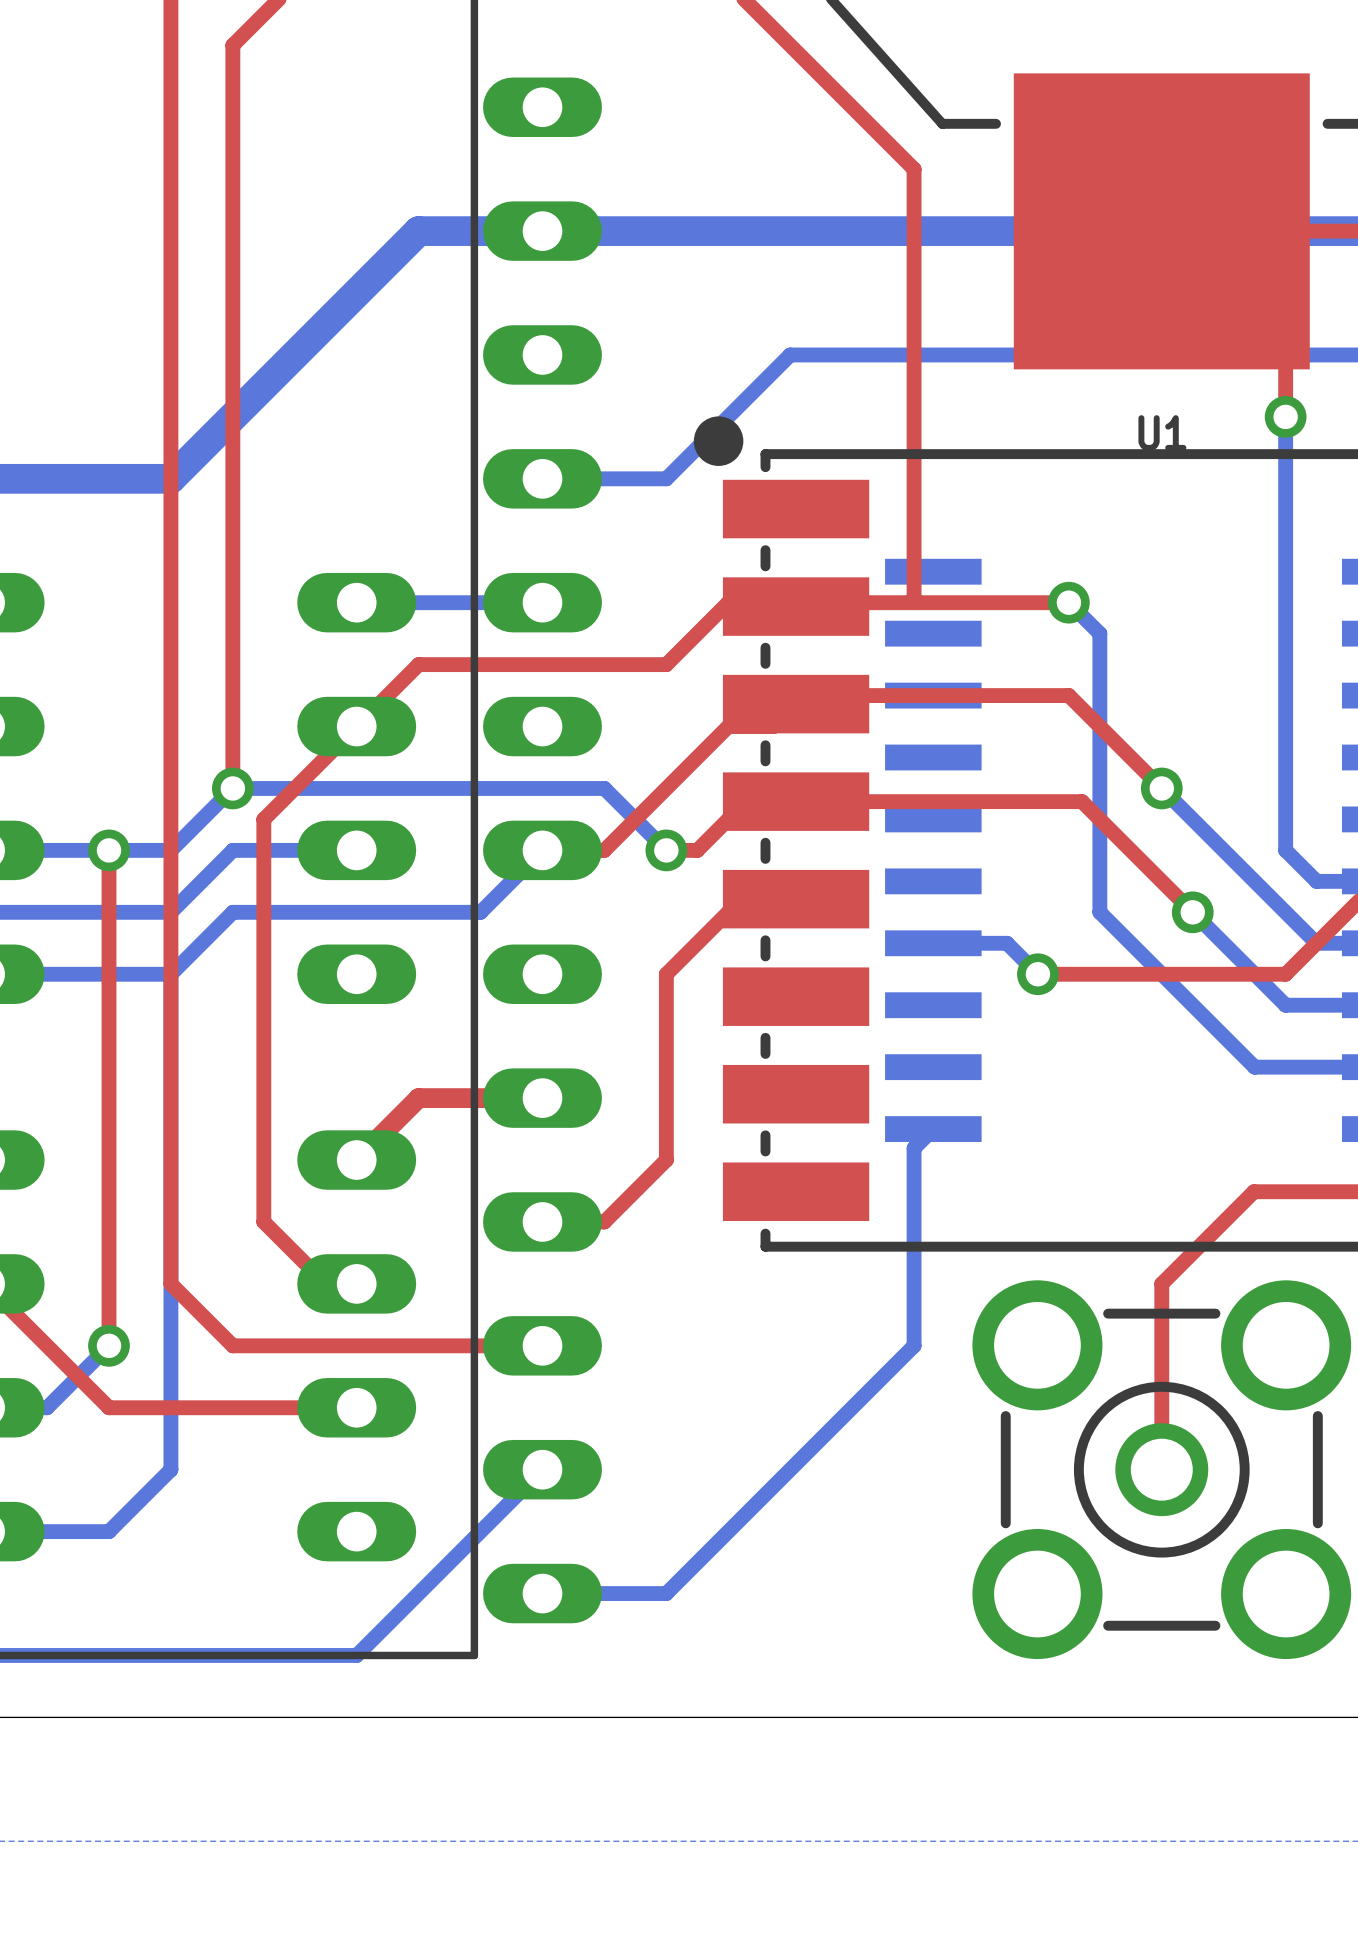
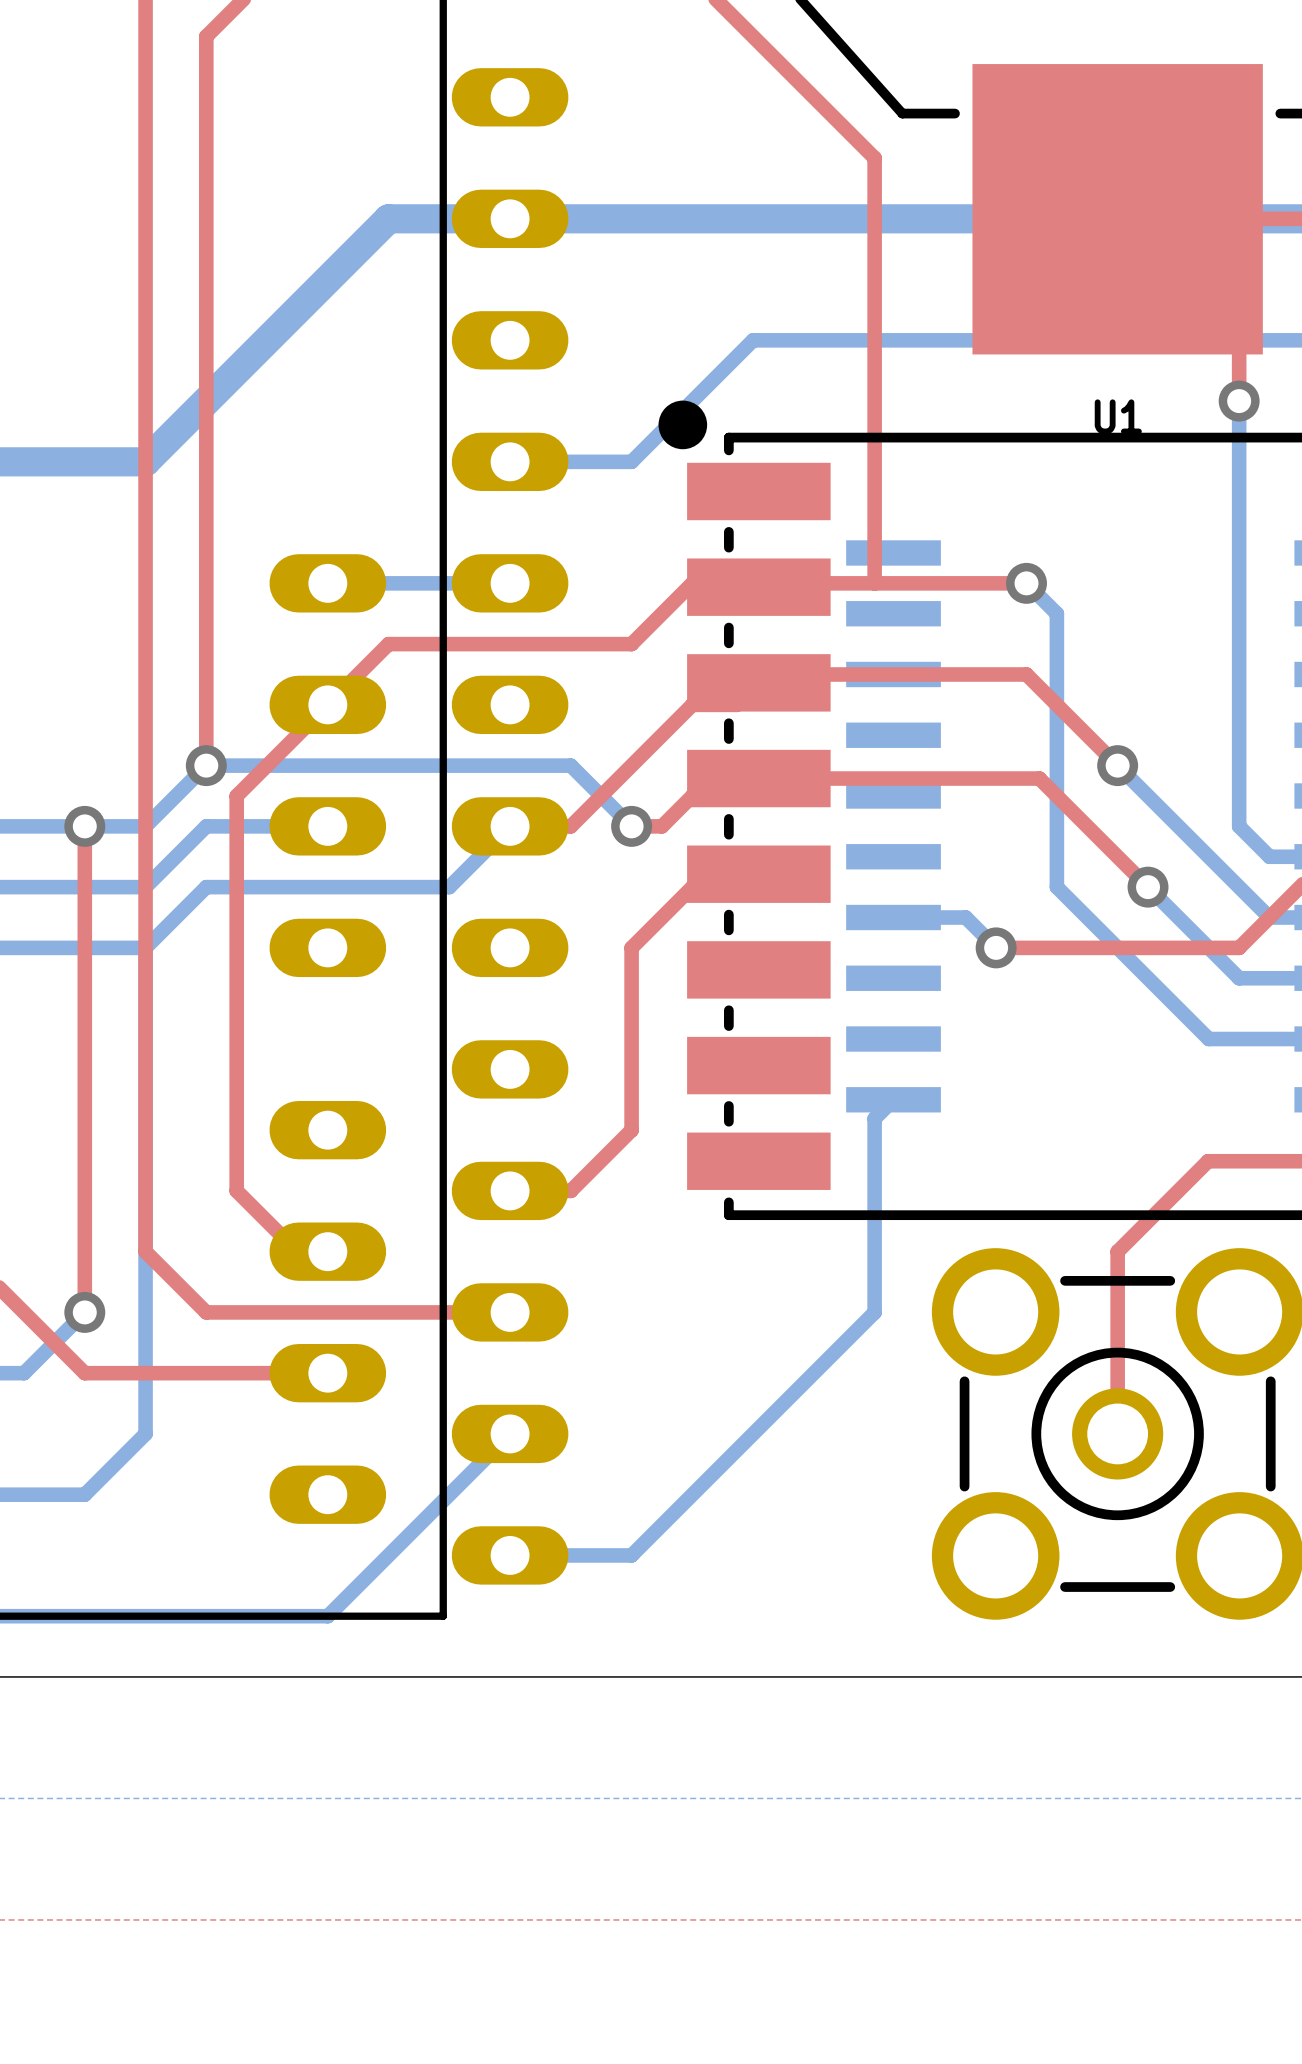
top track: (542, 1098) (418, 1098) (356, 1160) -> none

